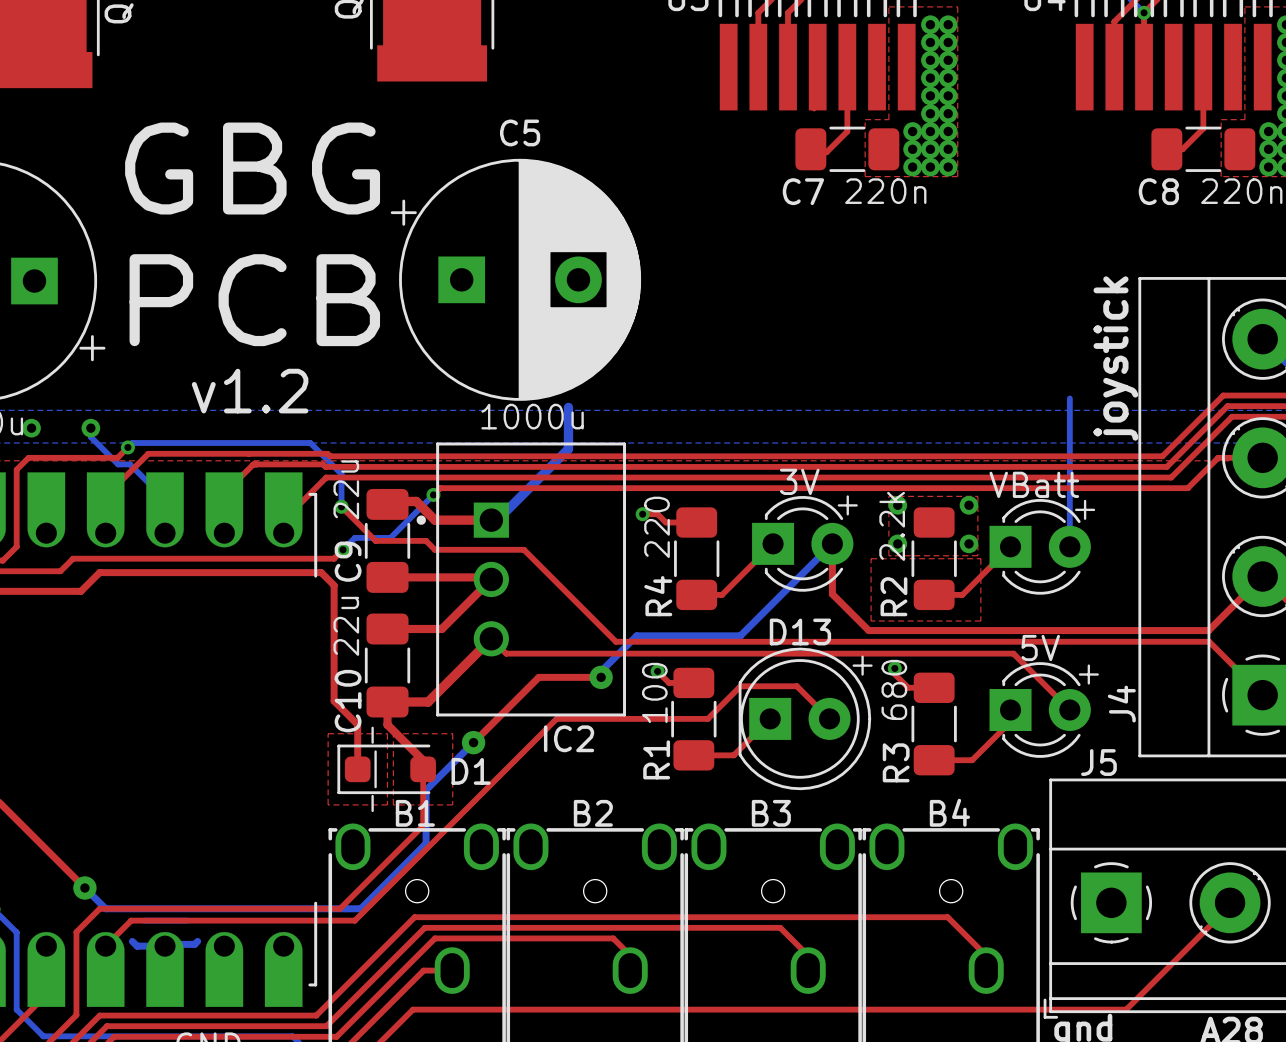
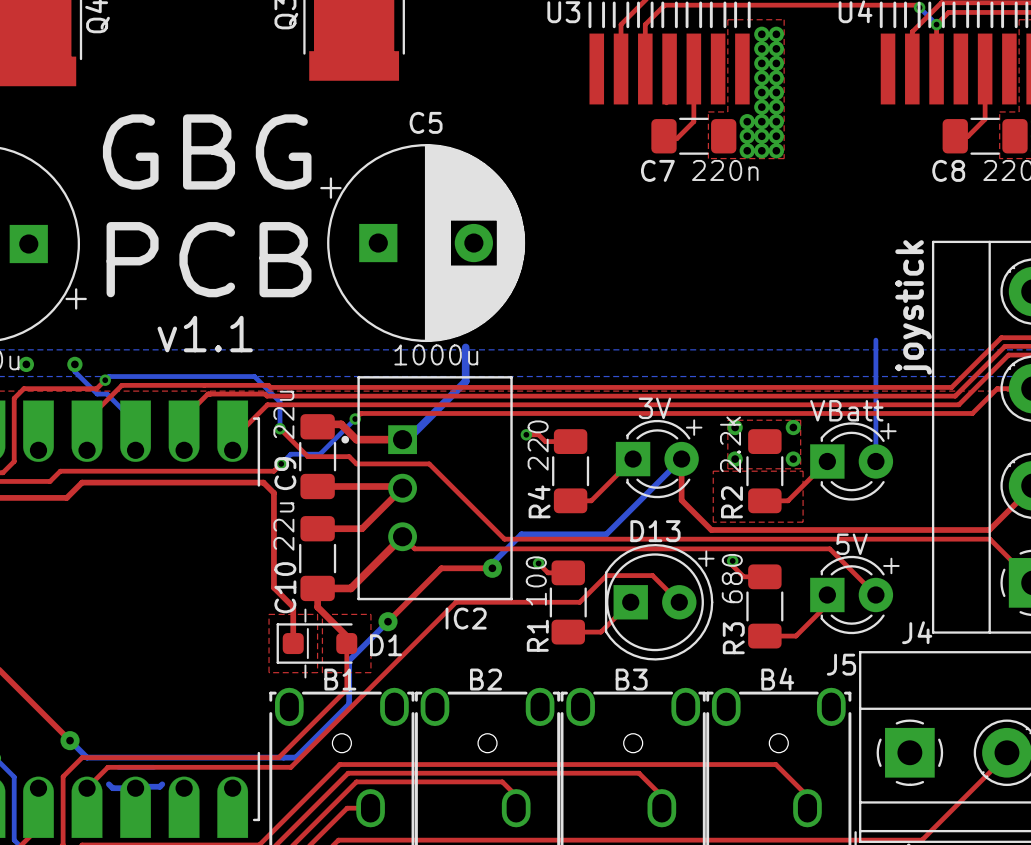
text: v1.2 (250, 391) -> v1.1 (205, 334)
J4 name rotation: 0° (1121, 704) -> 90° clockwise (917, 632)
J4 name position: J4 (1121, 704) -> J4 (917, 632)
J5 name position: J5 (1098, 762) -> J5 (841, 664)

